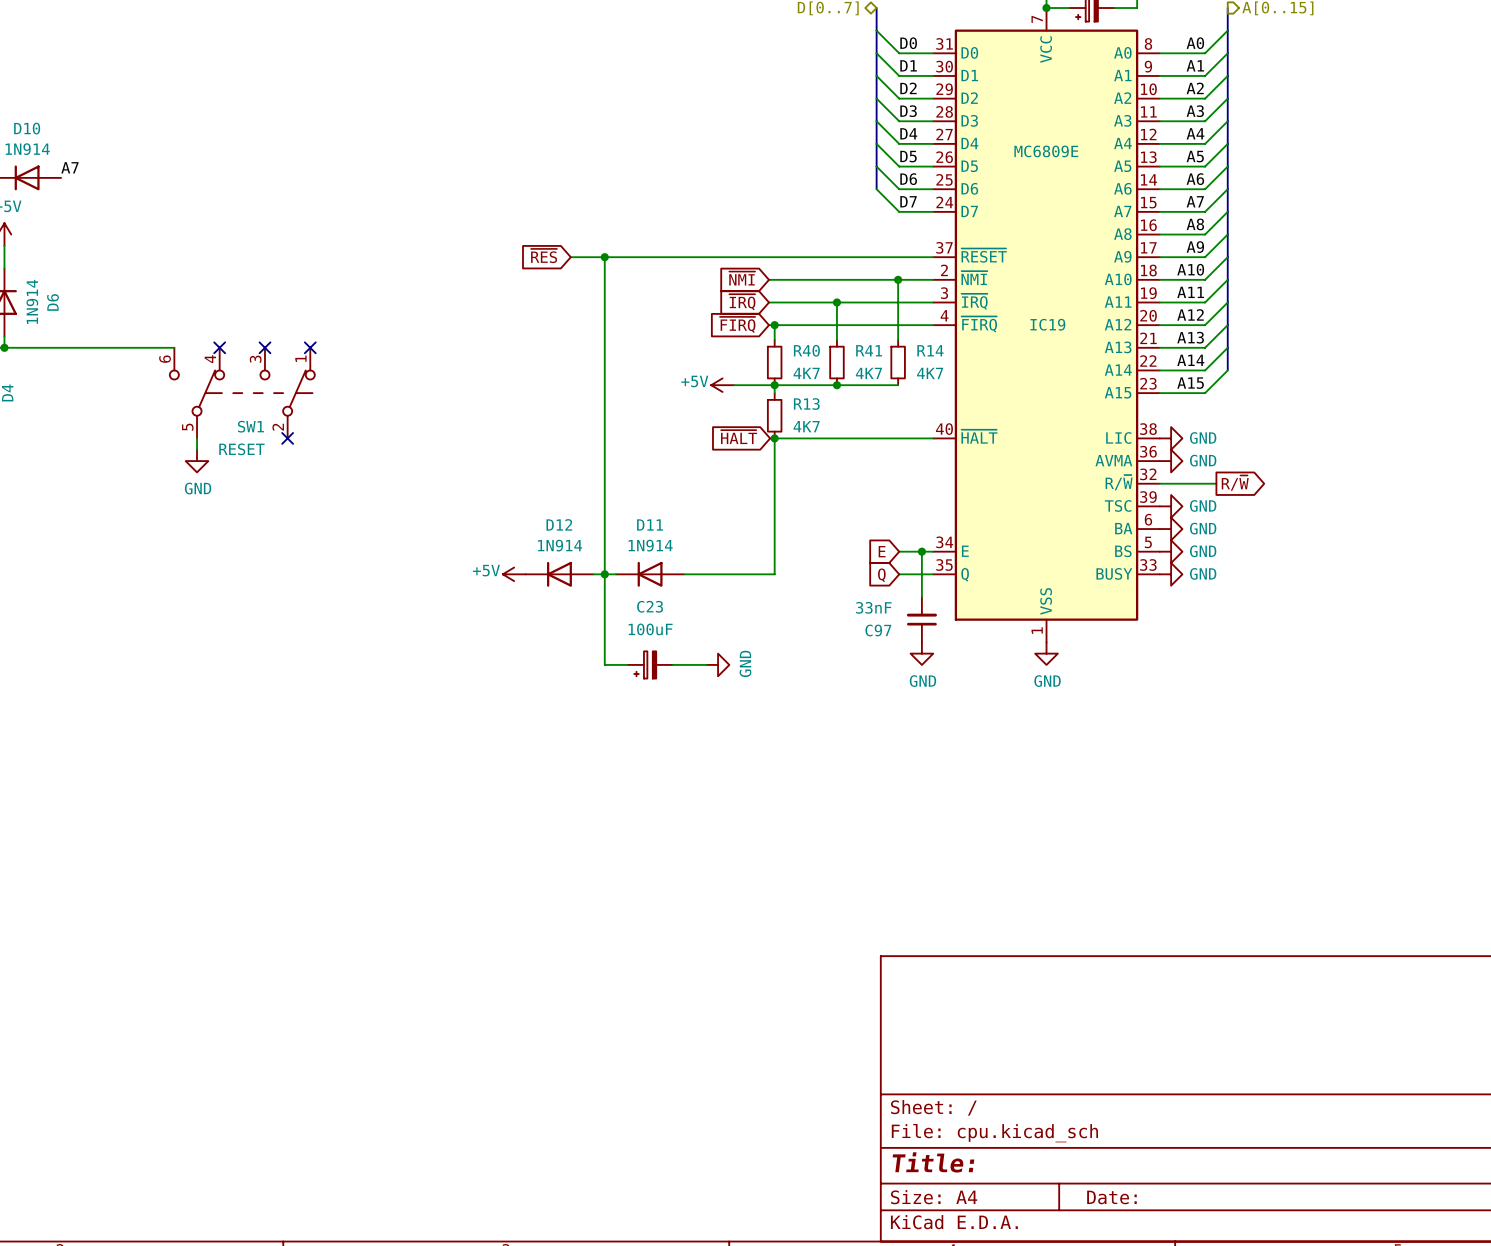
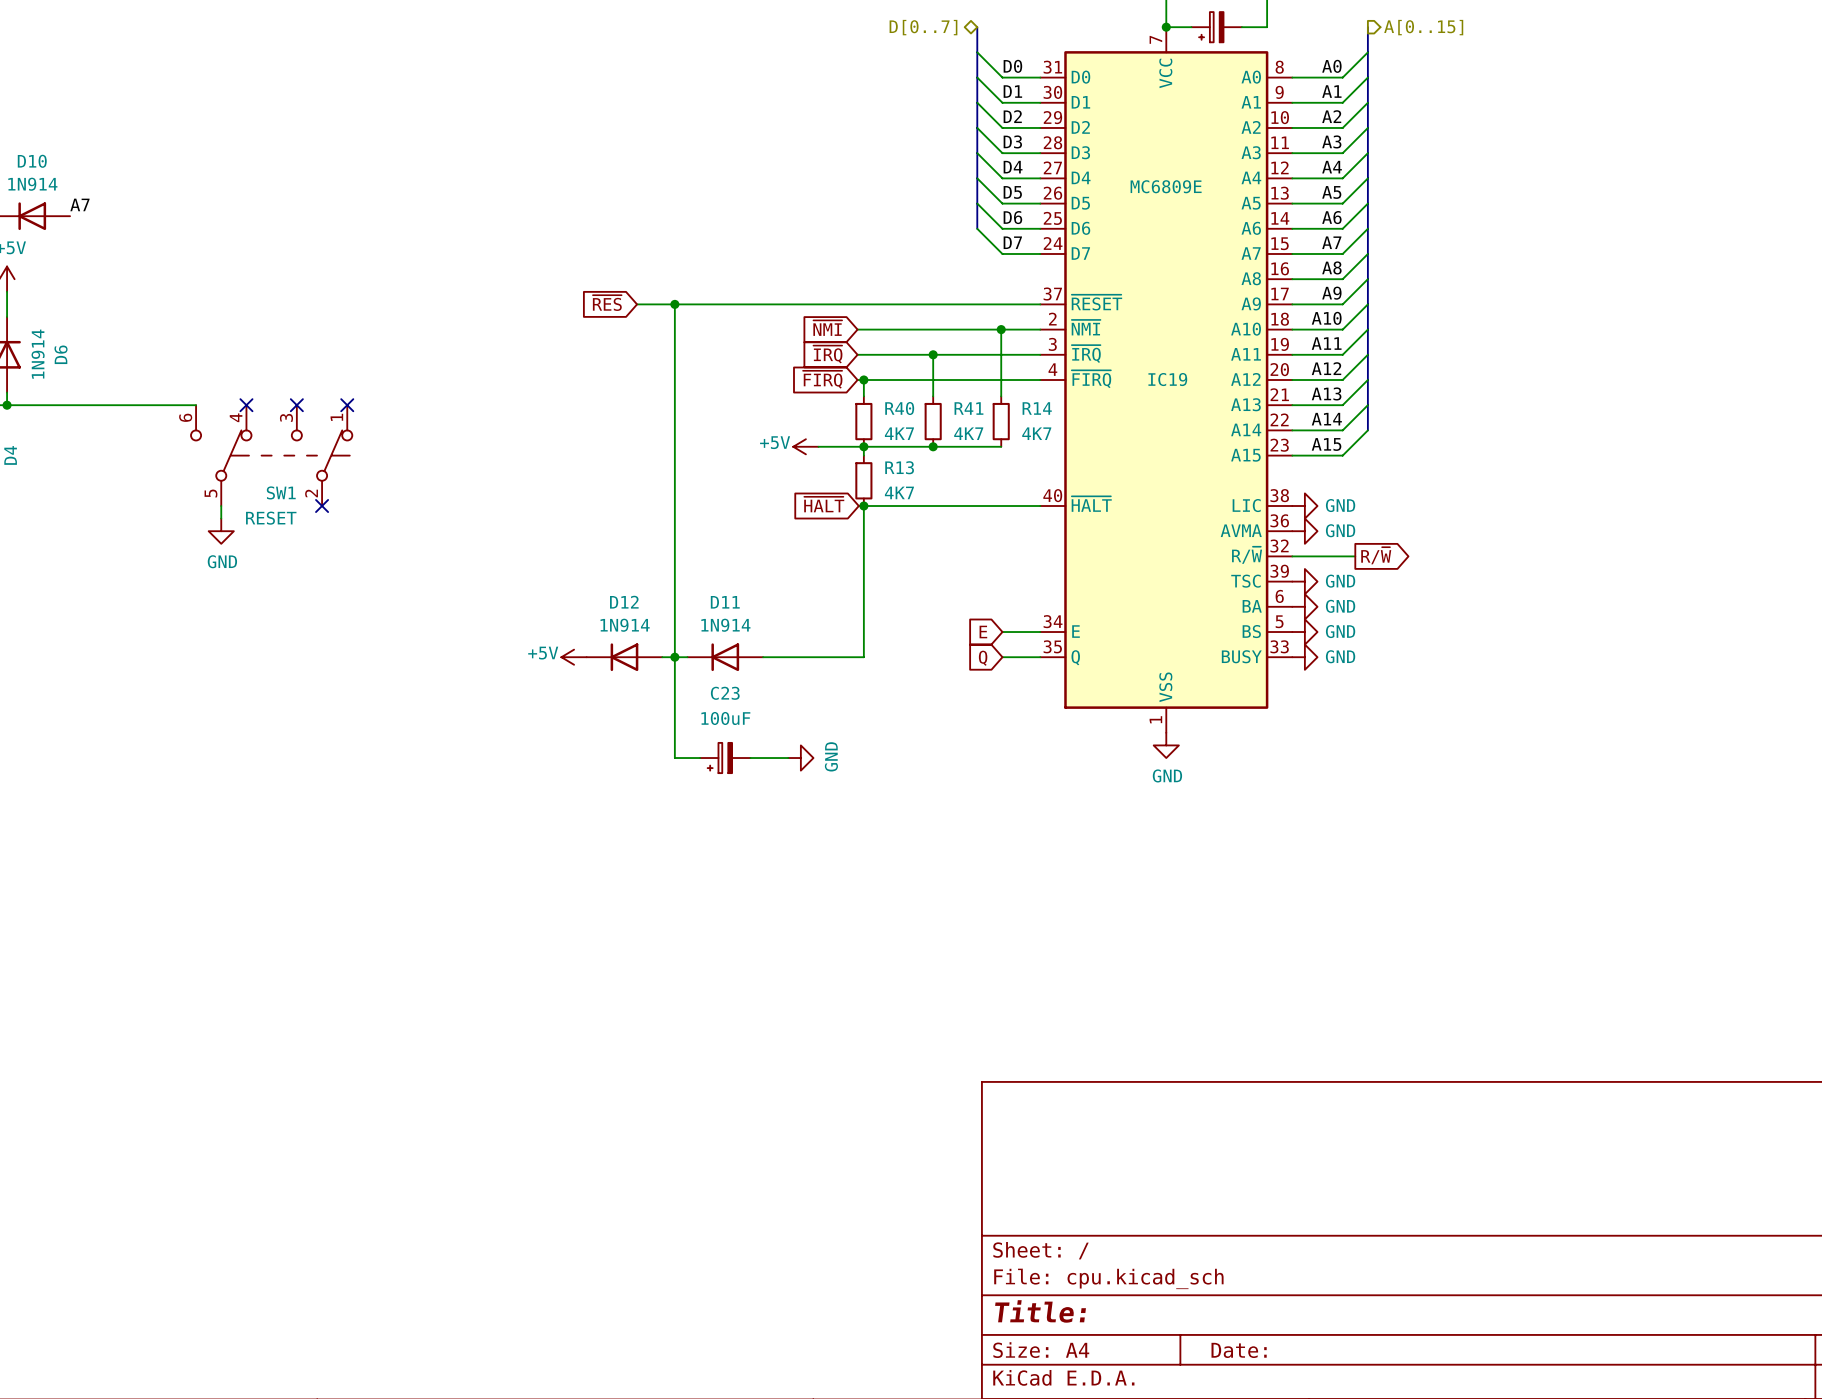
wire: (921, 551) (921, 596) -> none
junction: (921, 551) -> none
C97: 33nF (921, 619) -> none
power symbol: GND (921, 653) -> none

